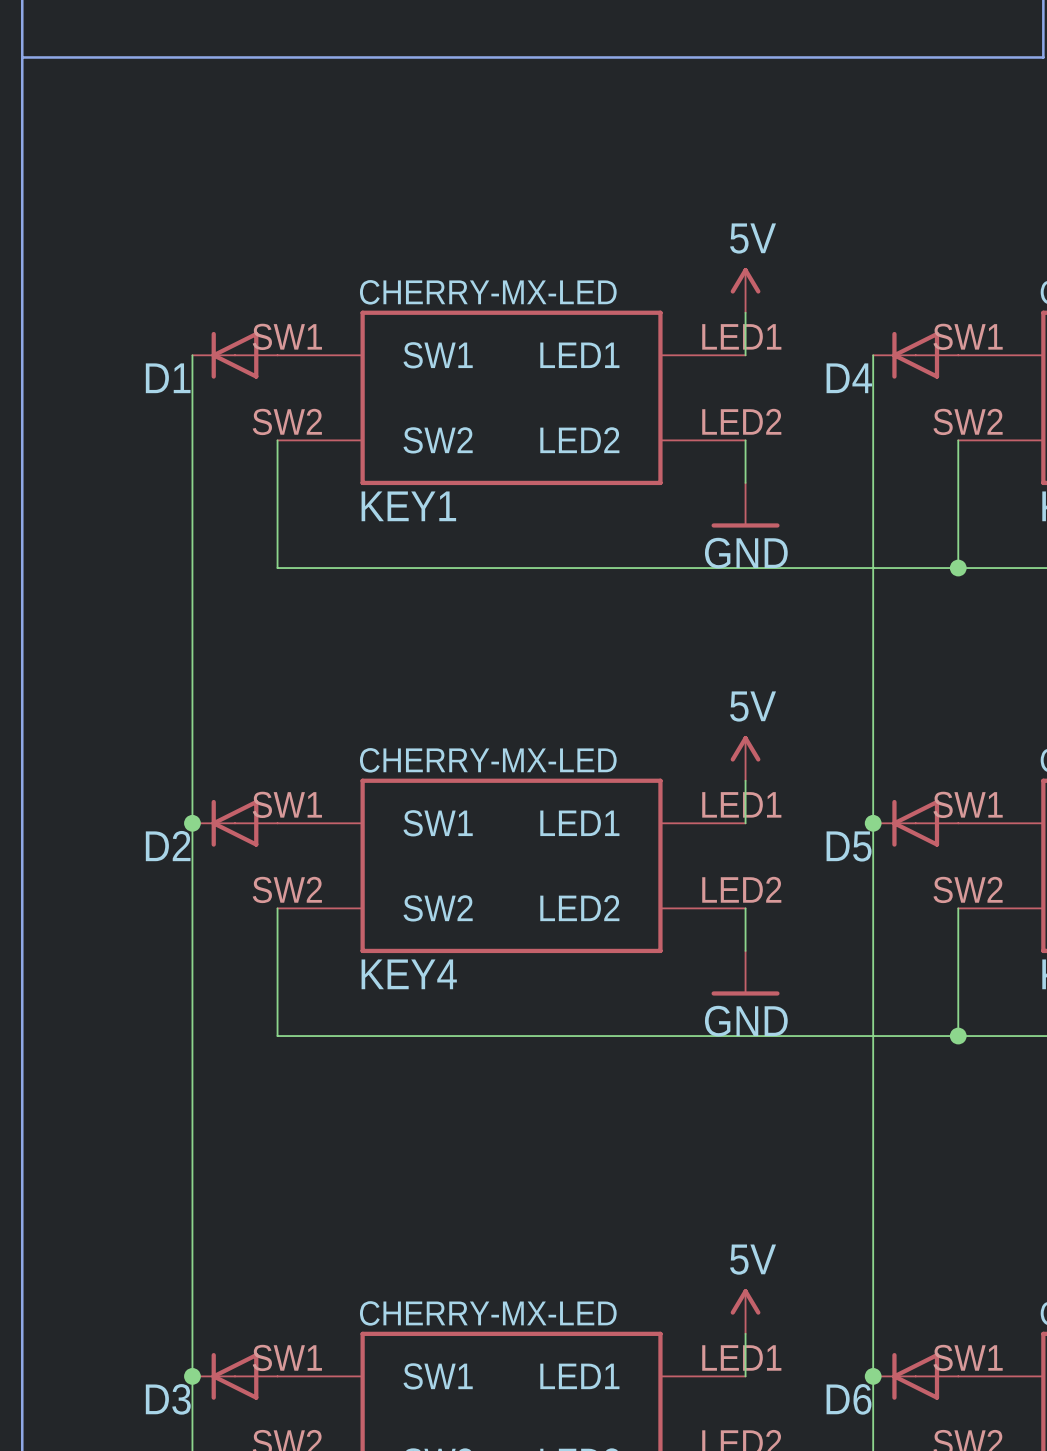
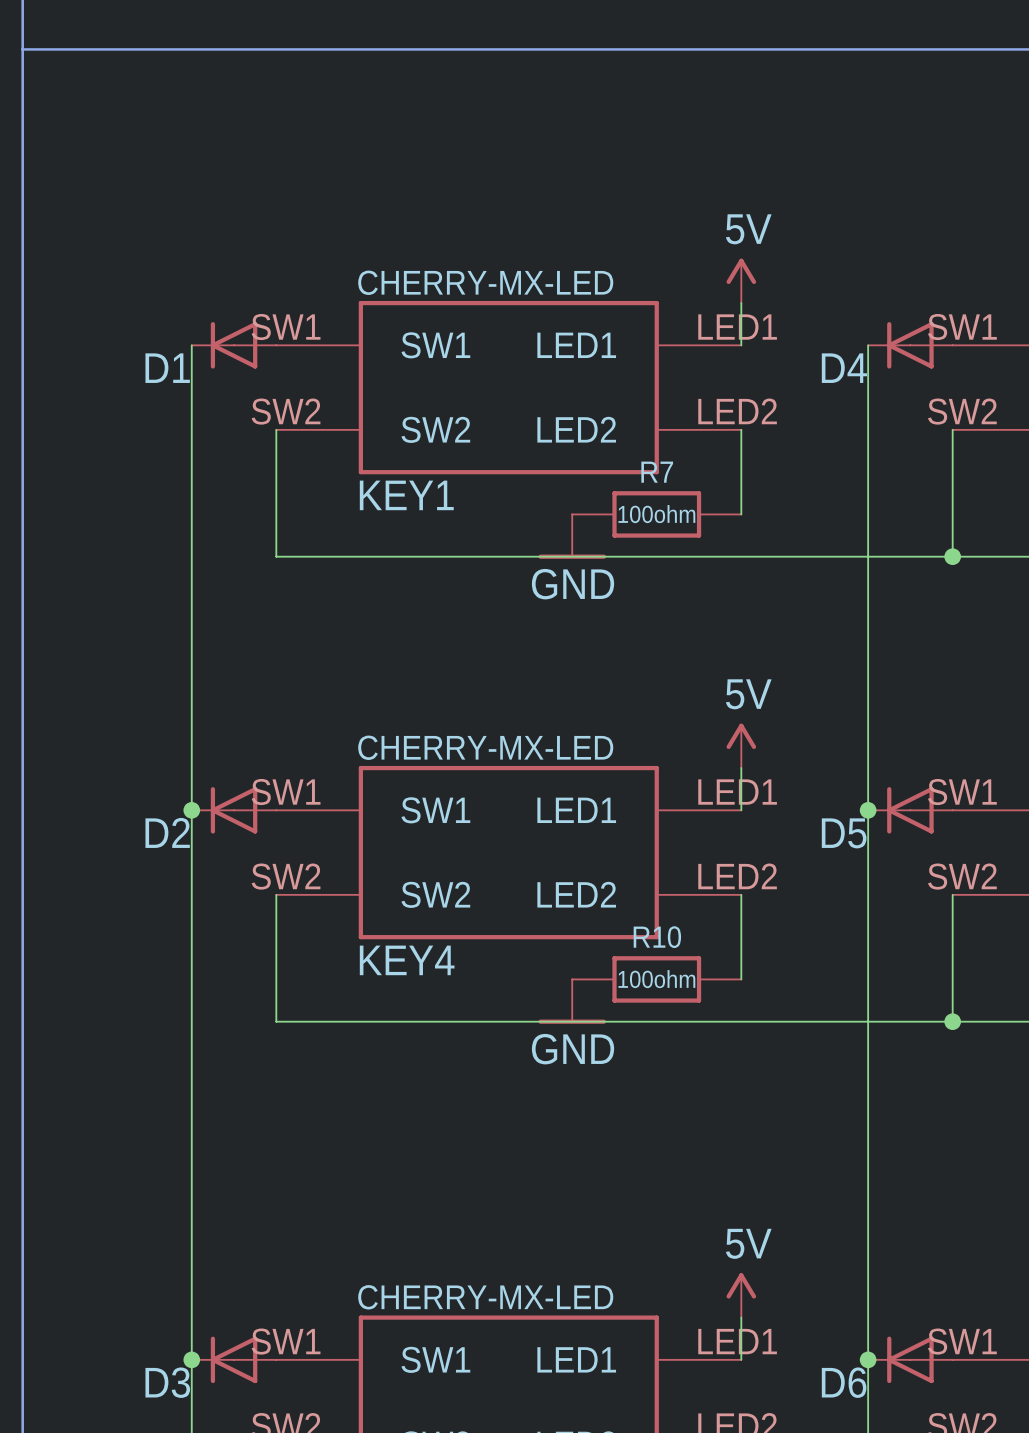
power symbol position: GND (745, 505) -> GND (572, 536)
R7: none -> 100ohm (656, 514)
power symbol position: GND (745, 973) -> GND (572, 1001)
R10: none -> 100ohm (656, 979)

